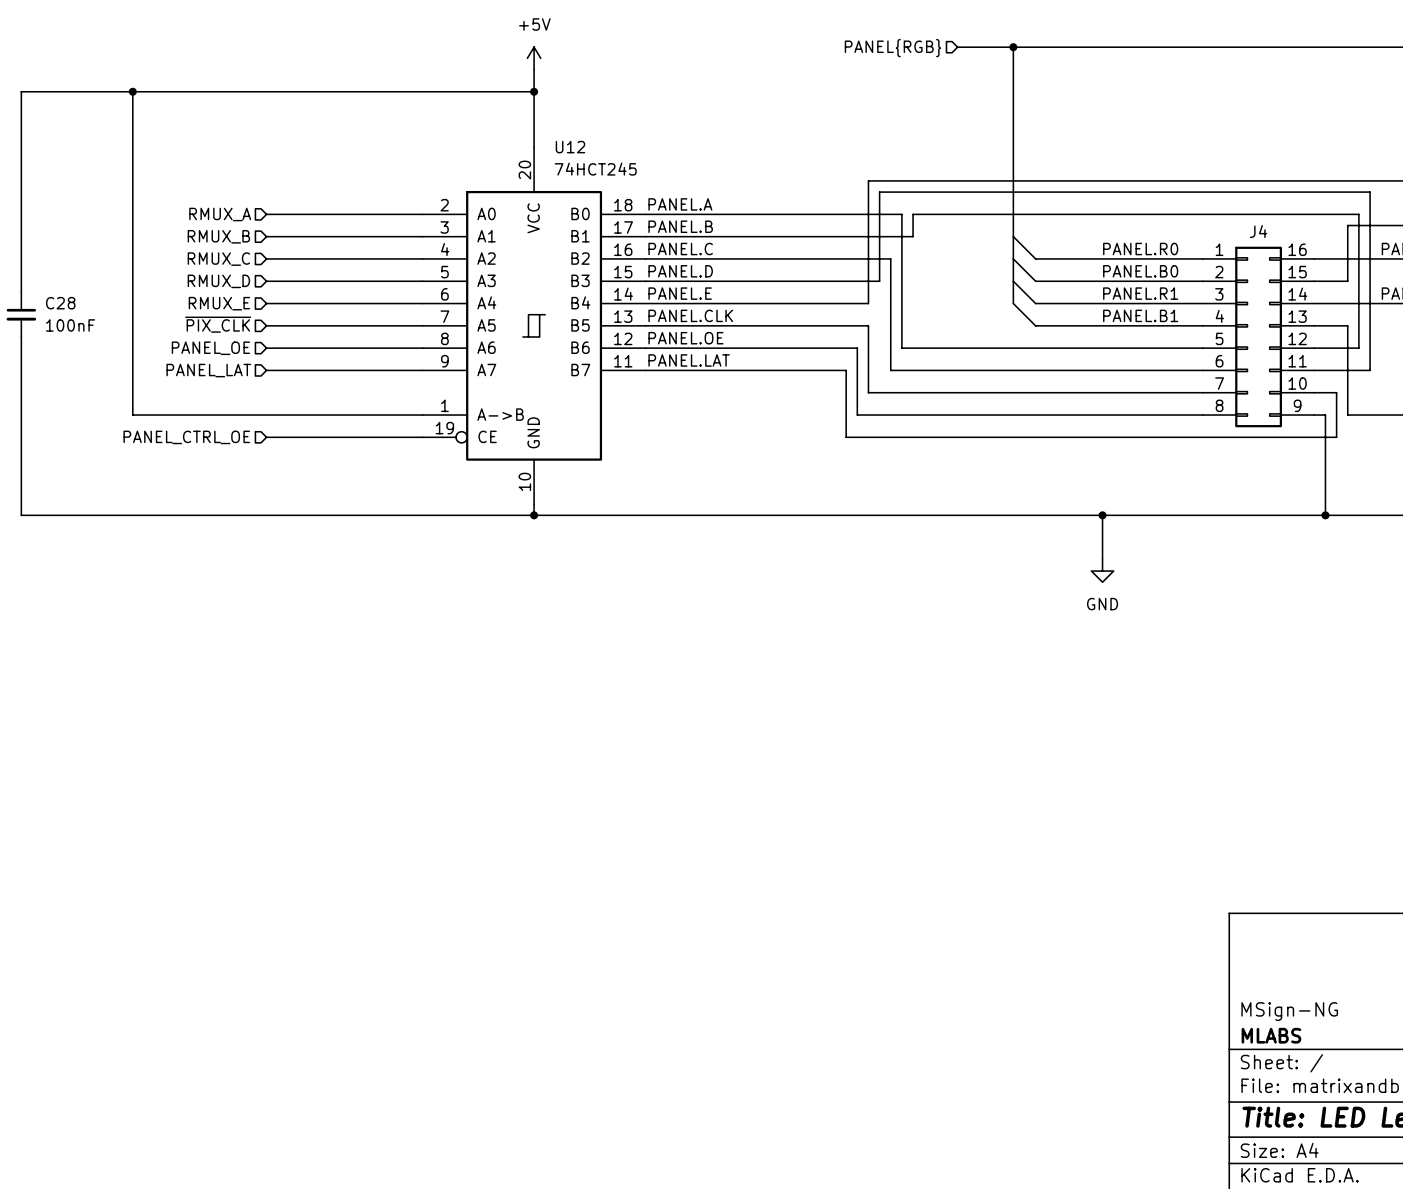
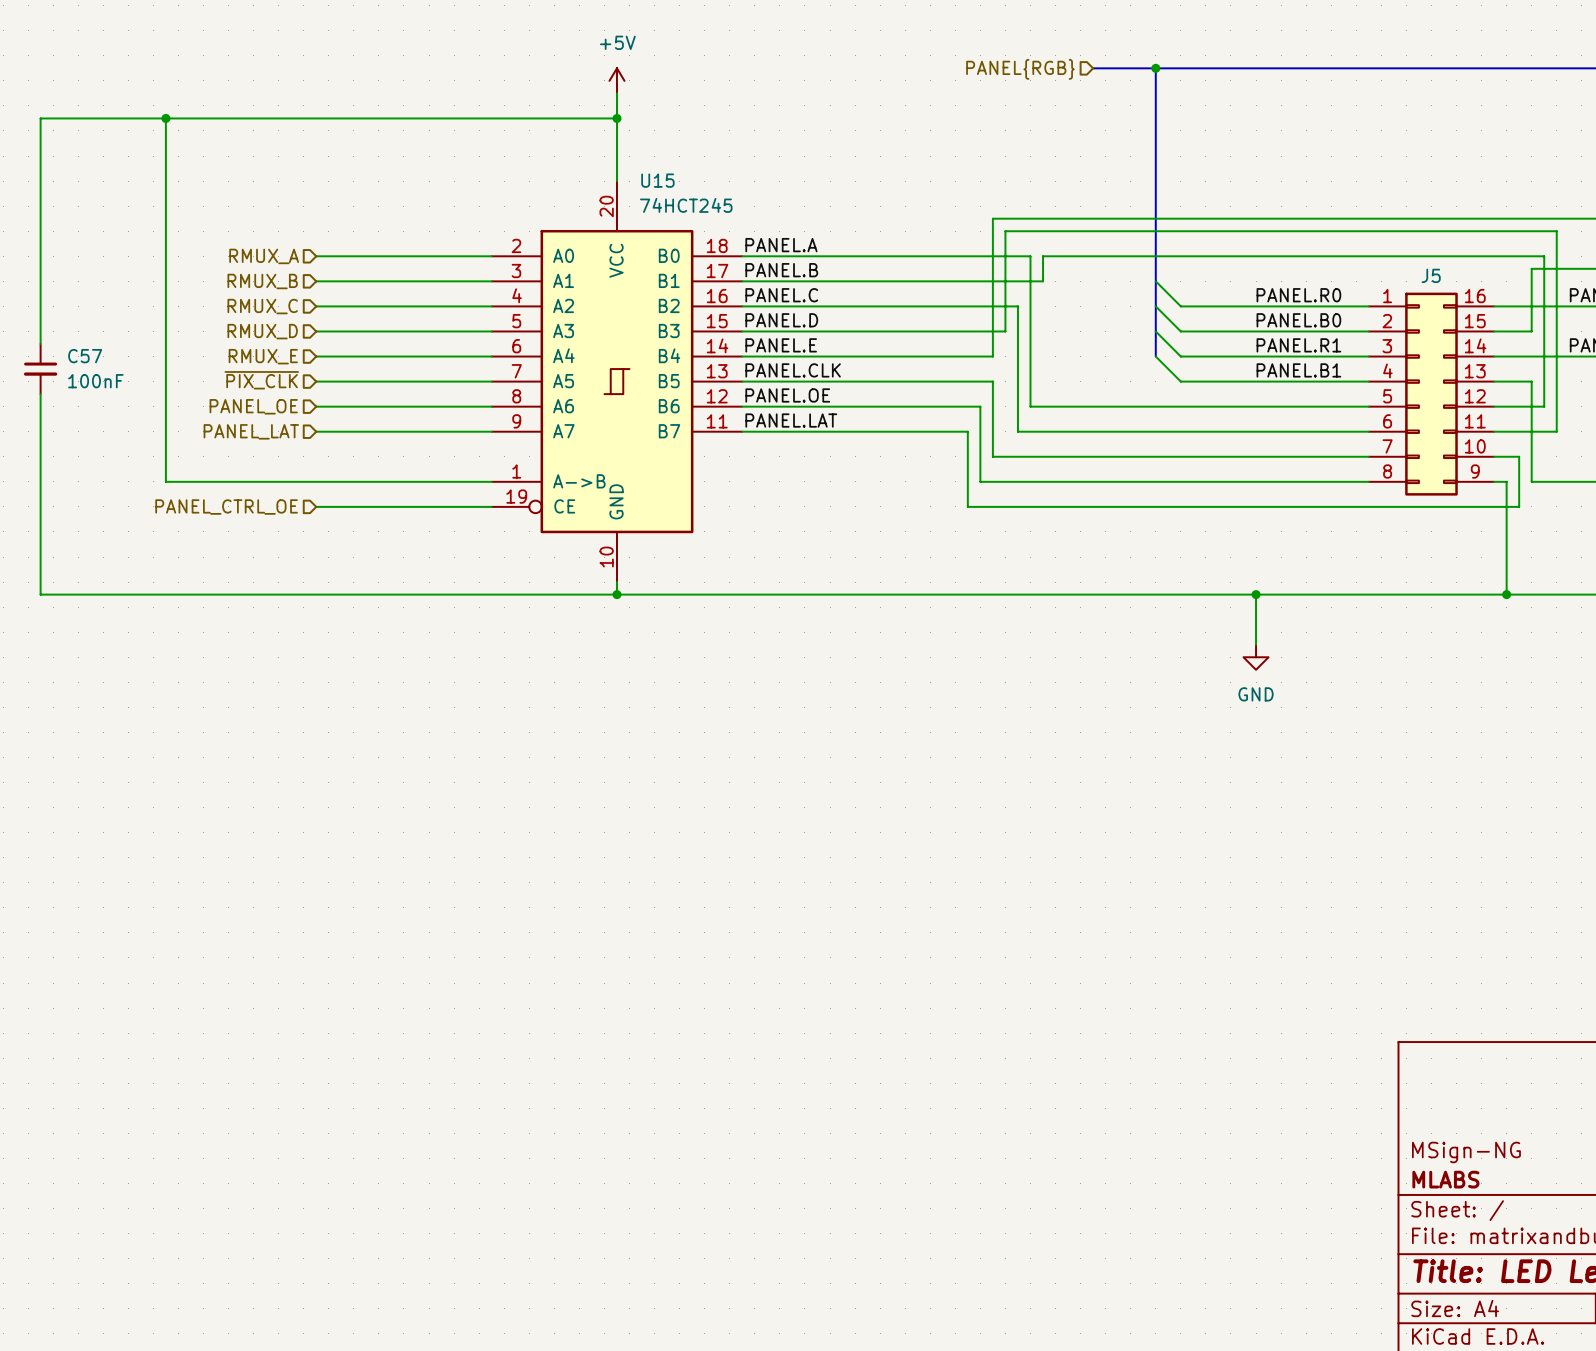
U12 name: U12 (570, 147) -> U15 (657, 180)
J4 name: J4 (1258, 231) -> J5 (1431, 275)
C28 name: C28 (60, 303) -> C57 (85, 356)

